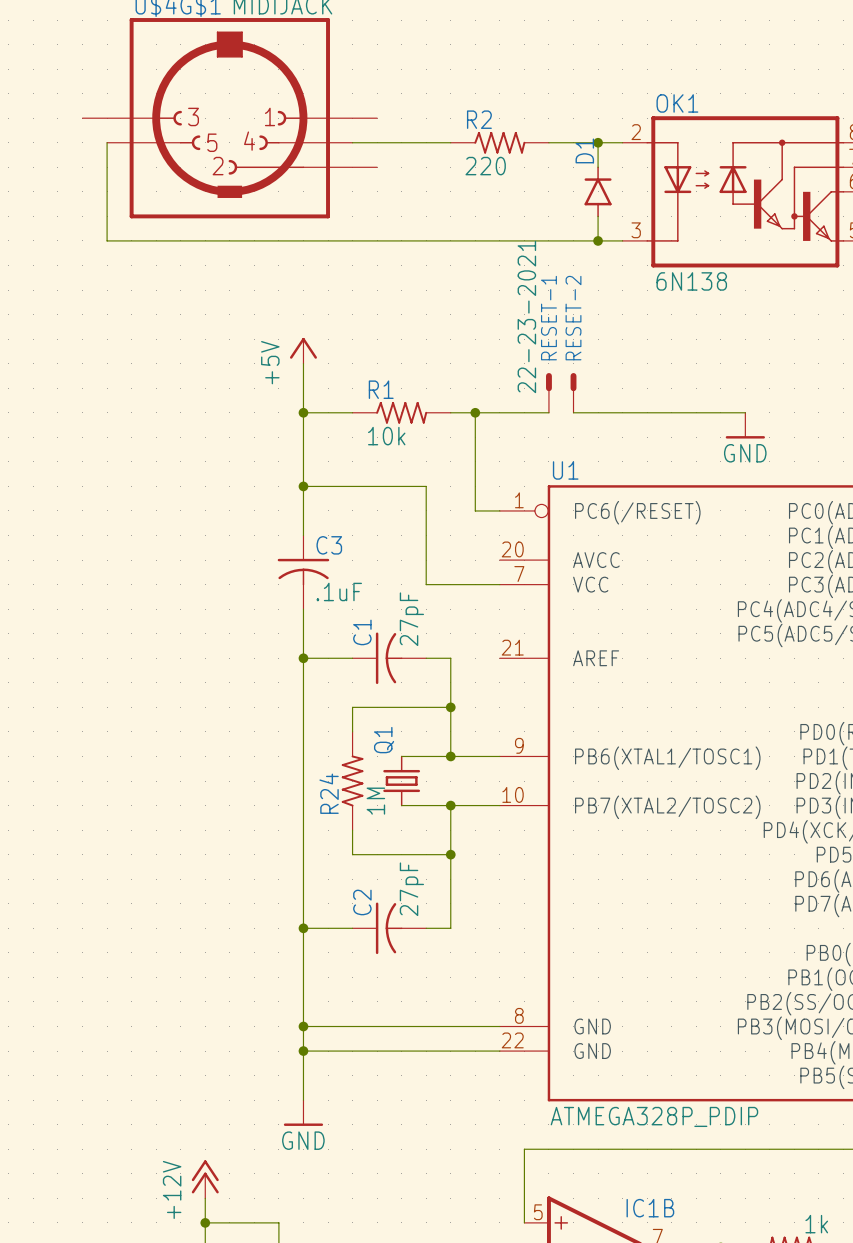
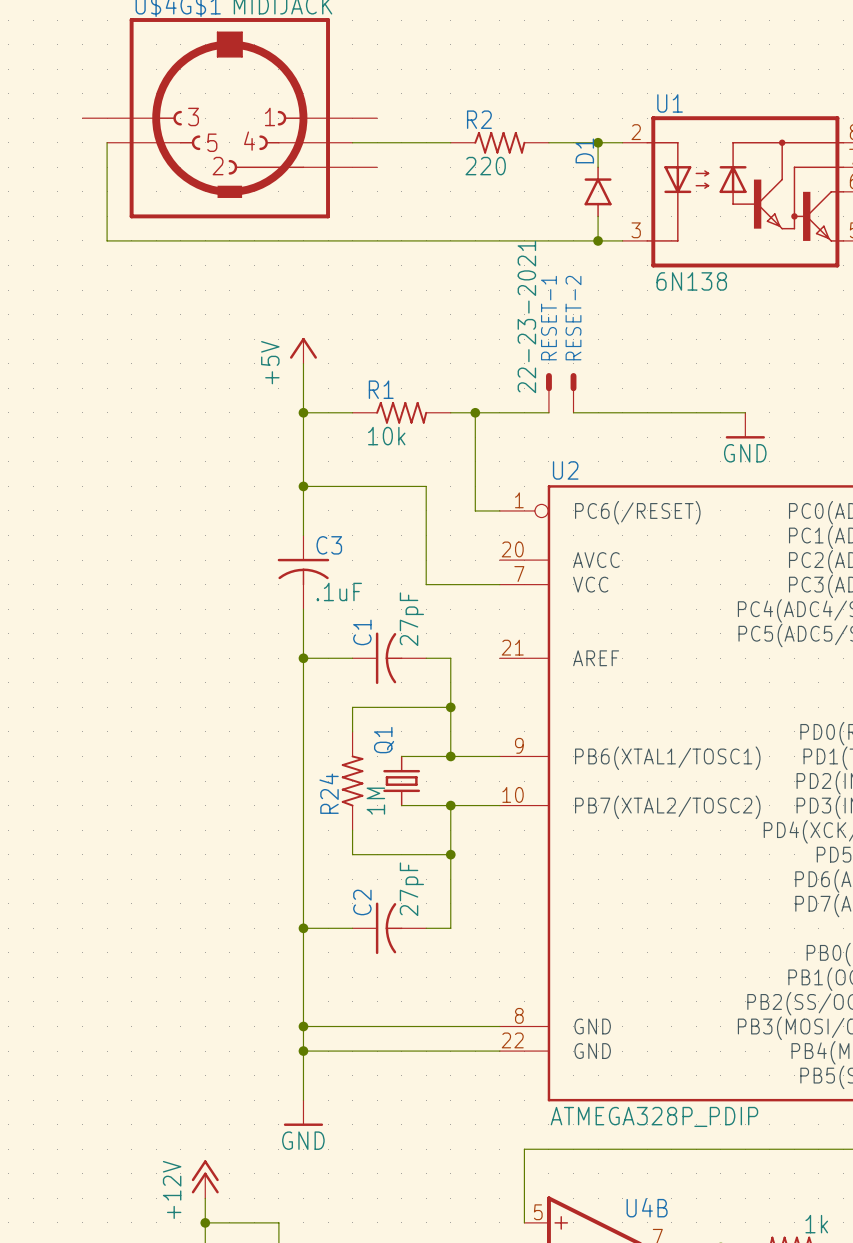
OK1 name: OK1 (677, 103) -> U1 (670, 103)
U1 name: U1 (565, 470) -> U2 (565, 470)
IC1B name: IC1B (650, 1208) -> U4B (647, 1207)

